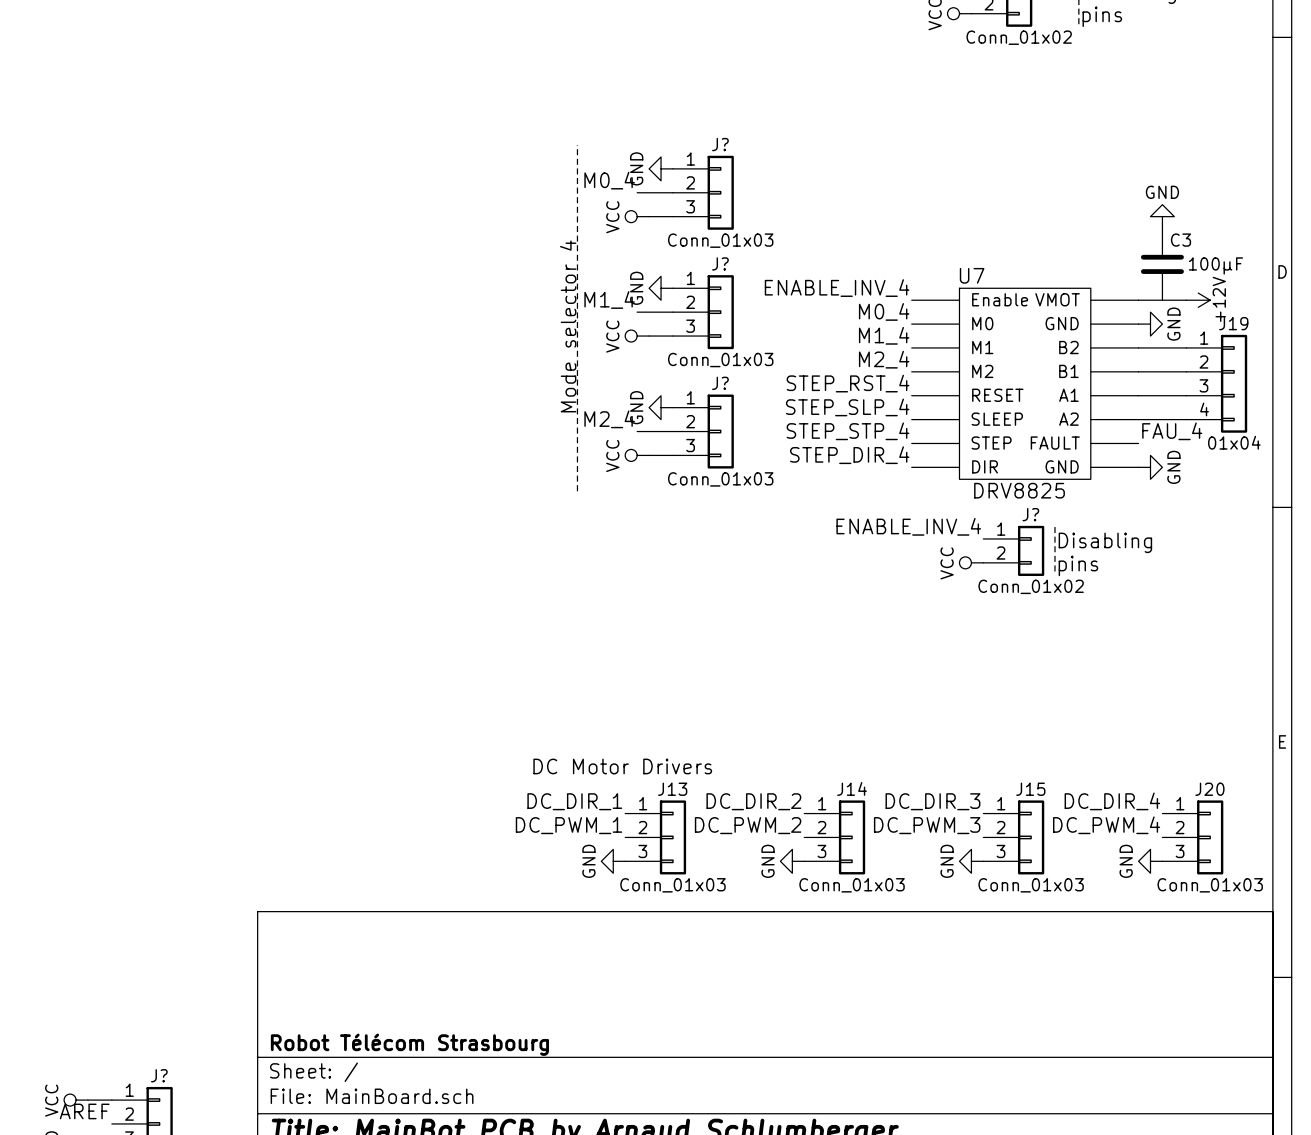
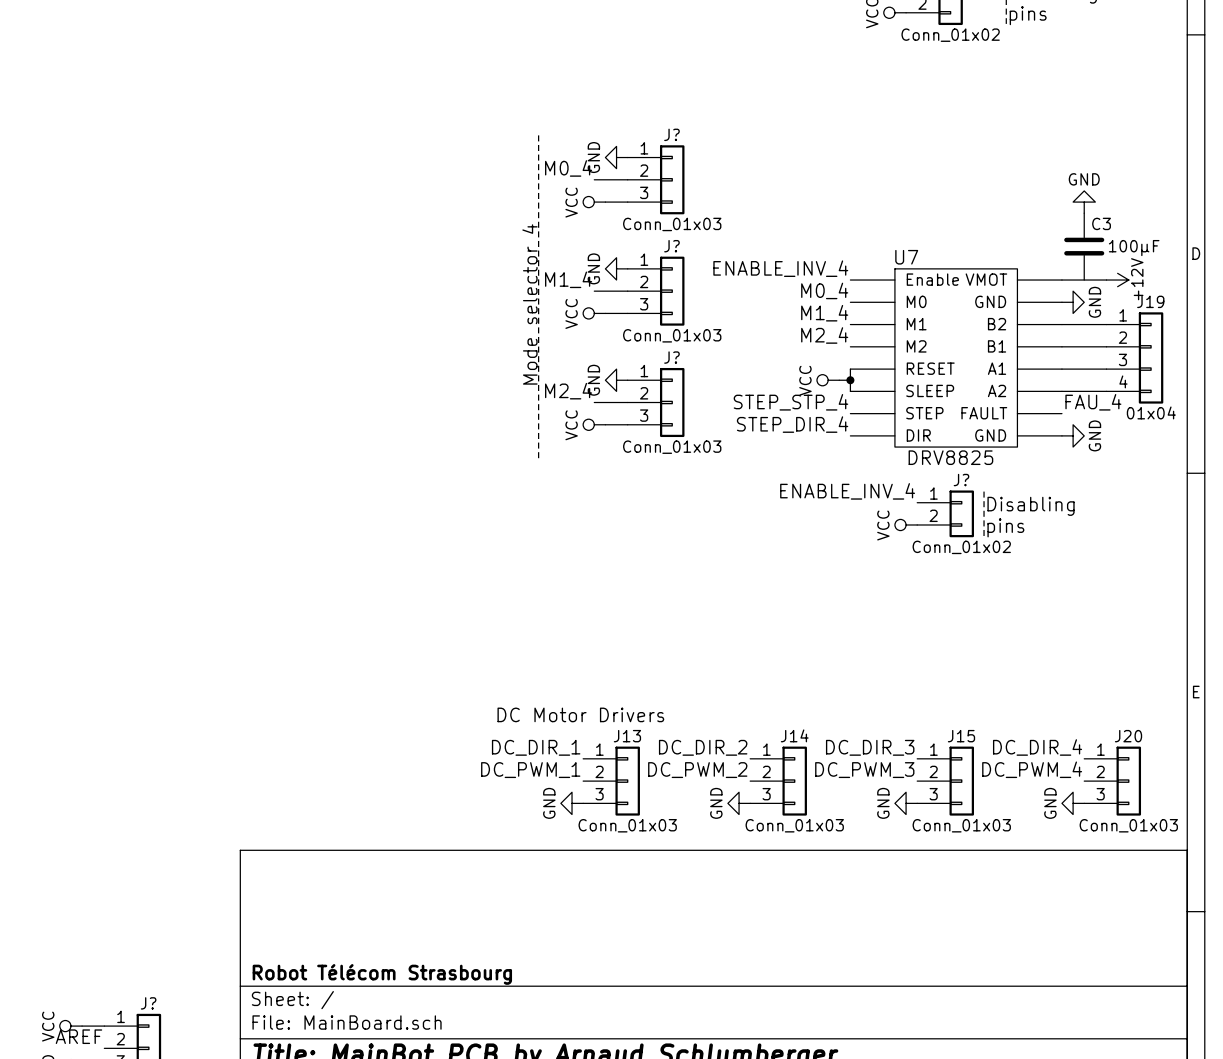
label: STEP_RST_4 (848, 383) -> none
wire: none -> (850, 369) (850, 391)
label: STEP_SLP_4 (847, 407) -> none
power symbol: none -> VCC (828, 380)
wire: none -> (839, 380) (850, 380)
junction: none -> (850, 380)

